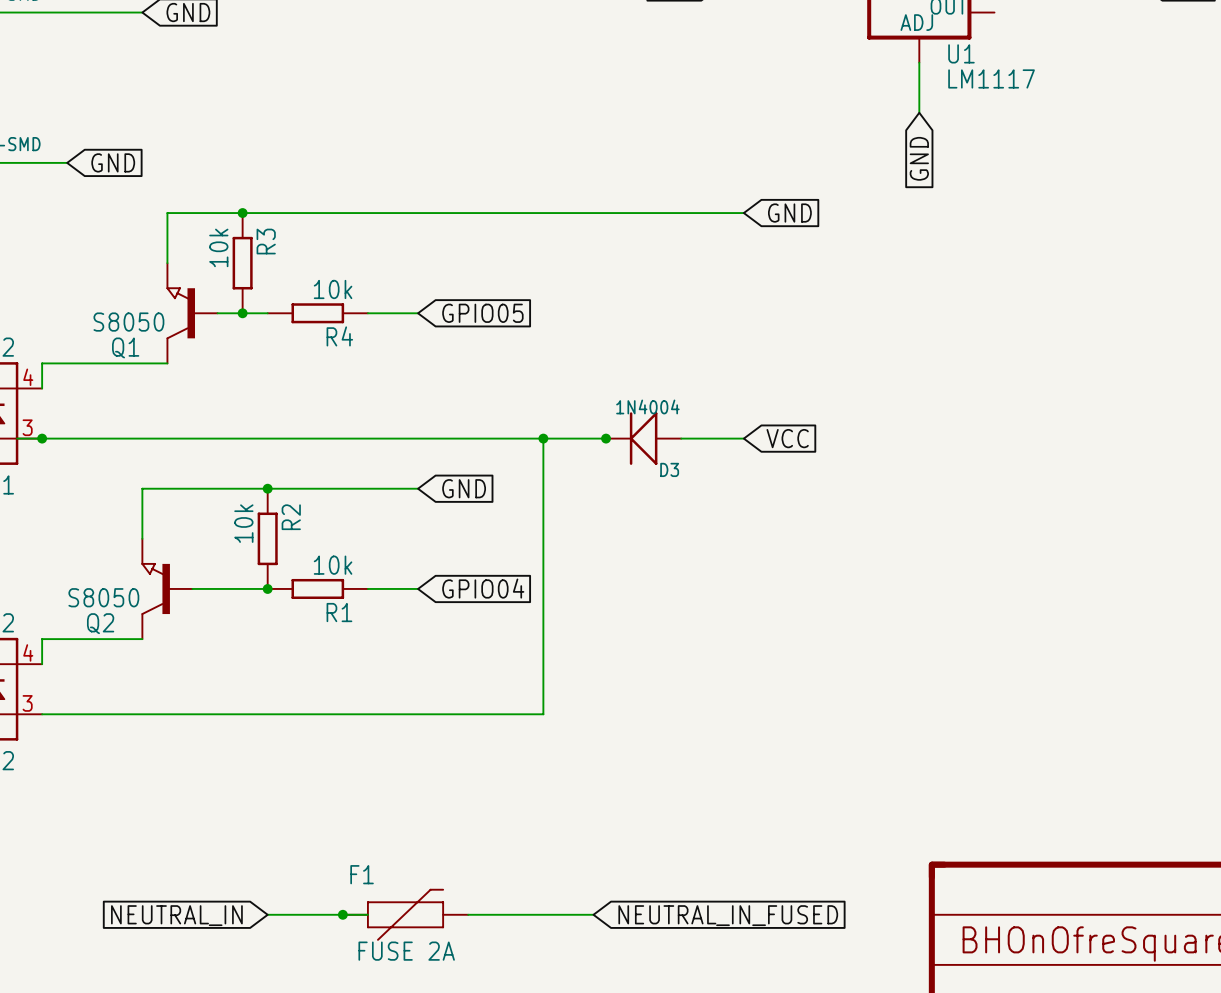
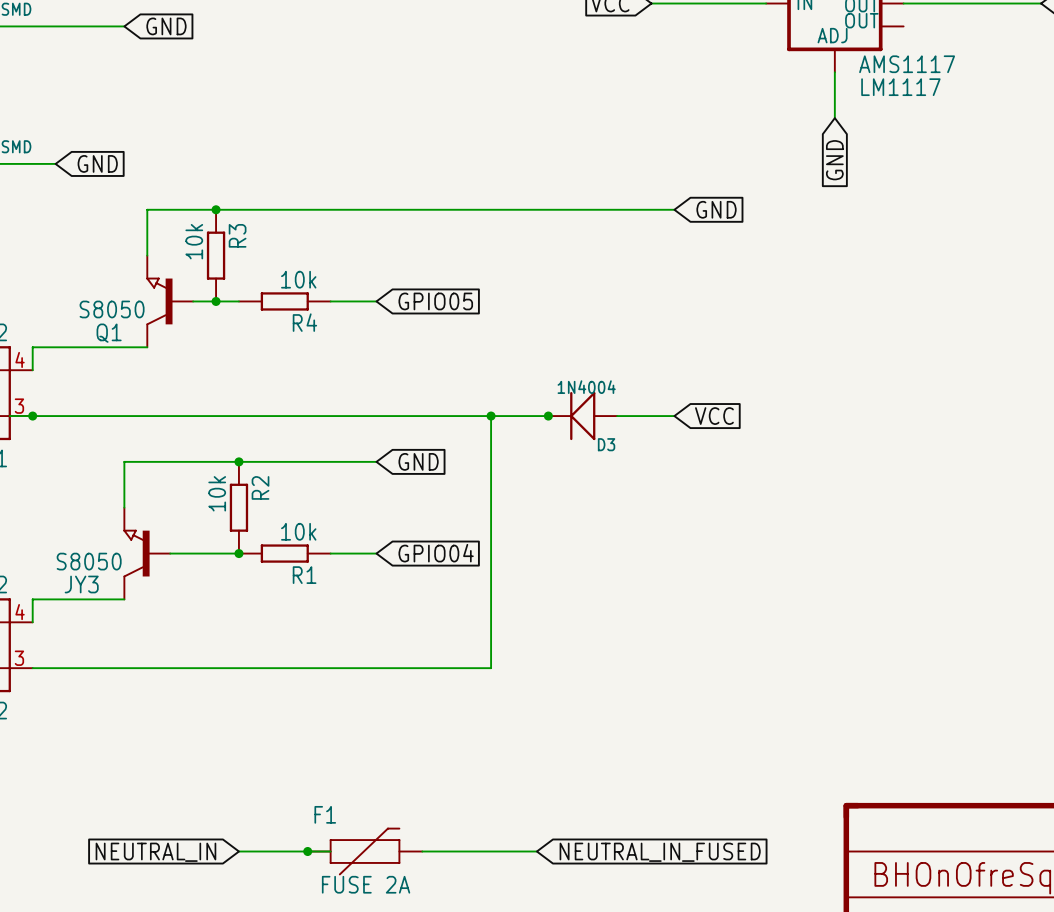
U1 name: U1 (961, 53) -> AMS1117 (907, 64)
Q2 name: Q2 (100, 623) -> JY3 (81, 584)

